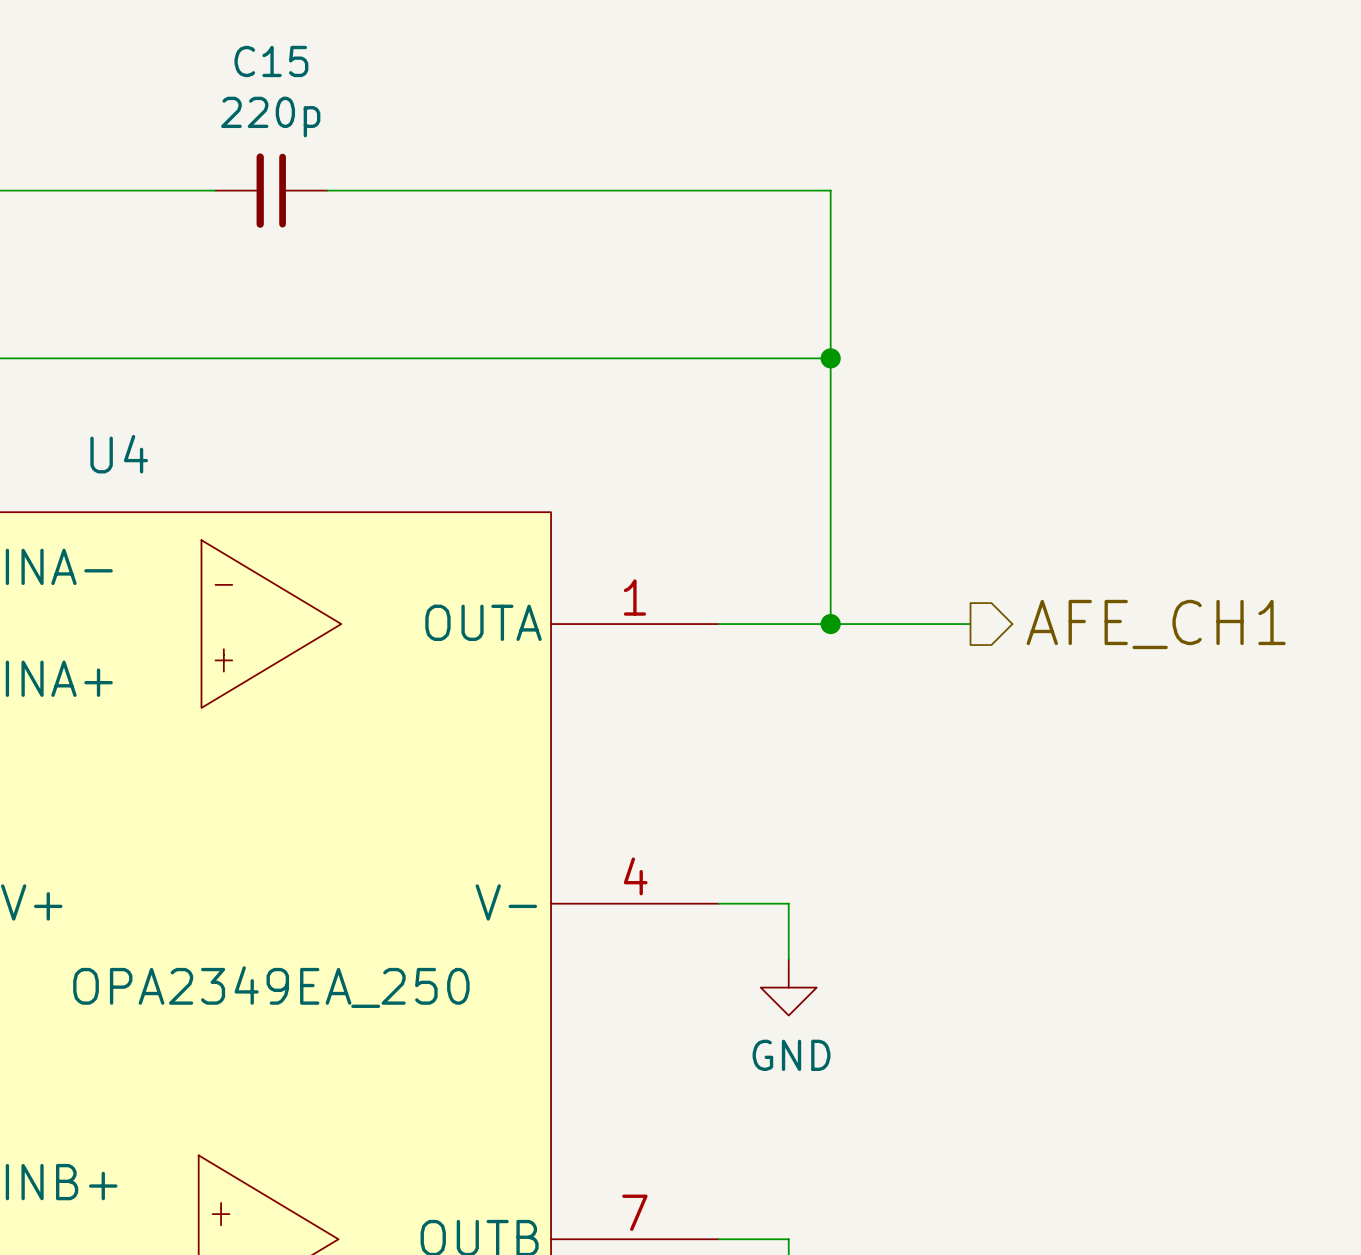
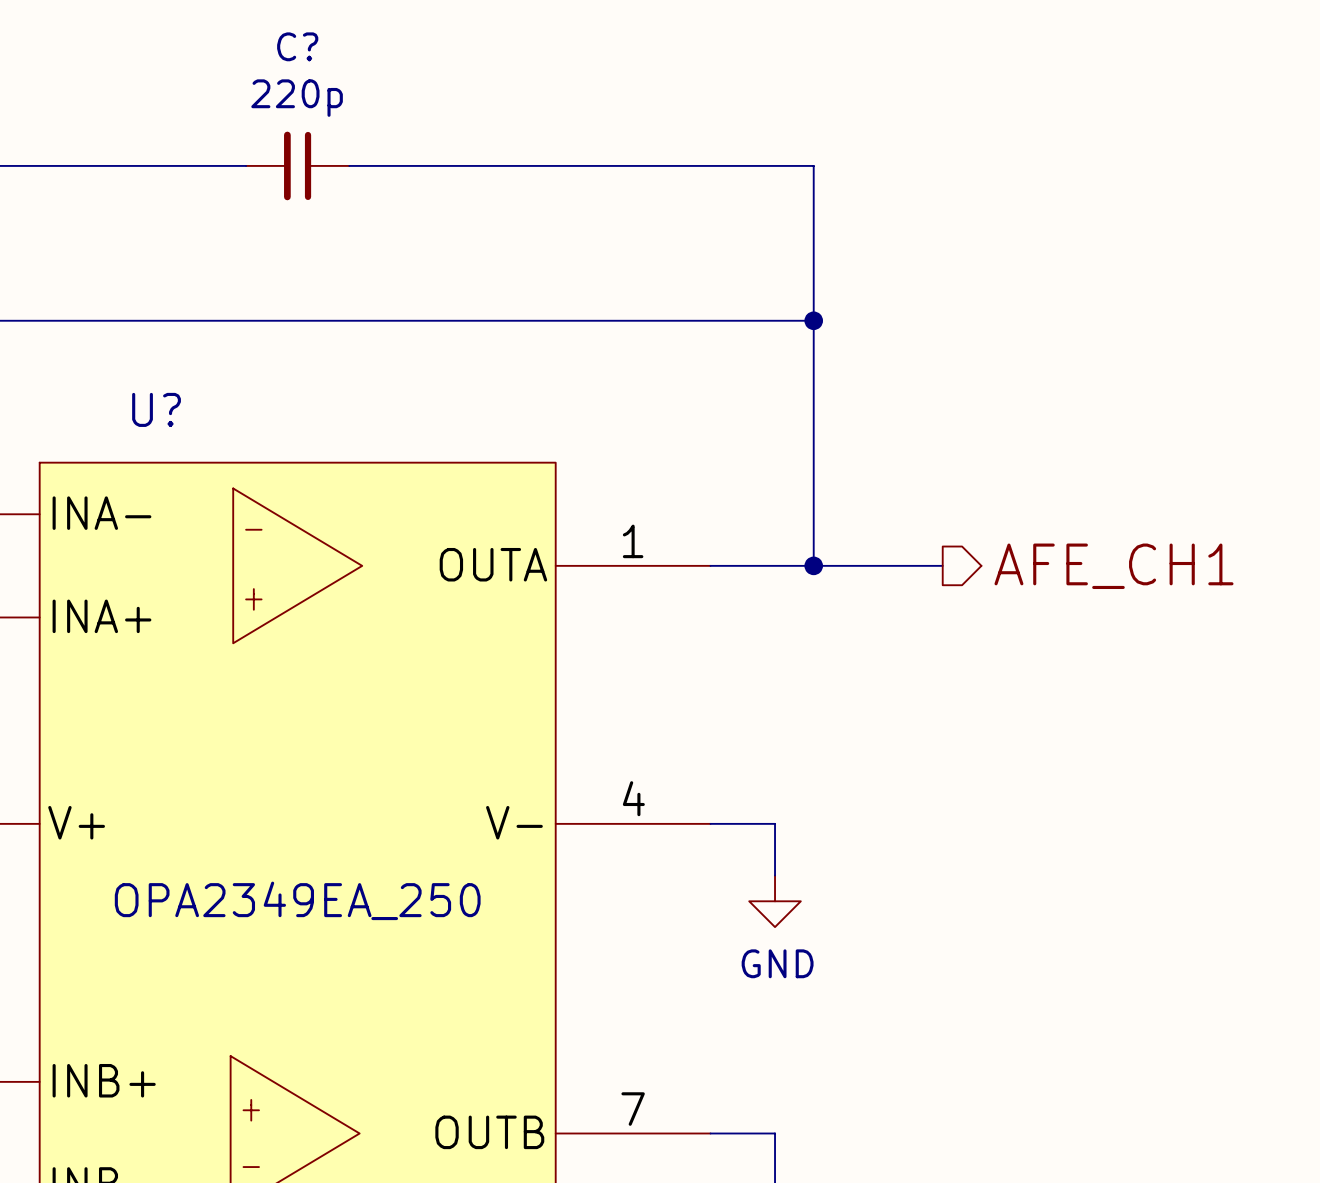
C15 name: C15 (271, 61) -> C? (297, 46)
U4 name: U4 (119, 454) -> U? (156, 409)

